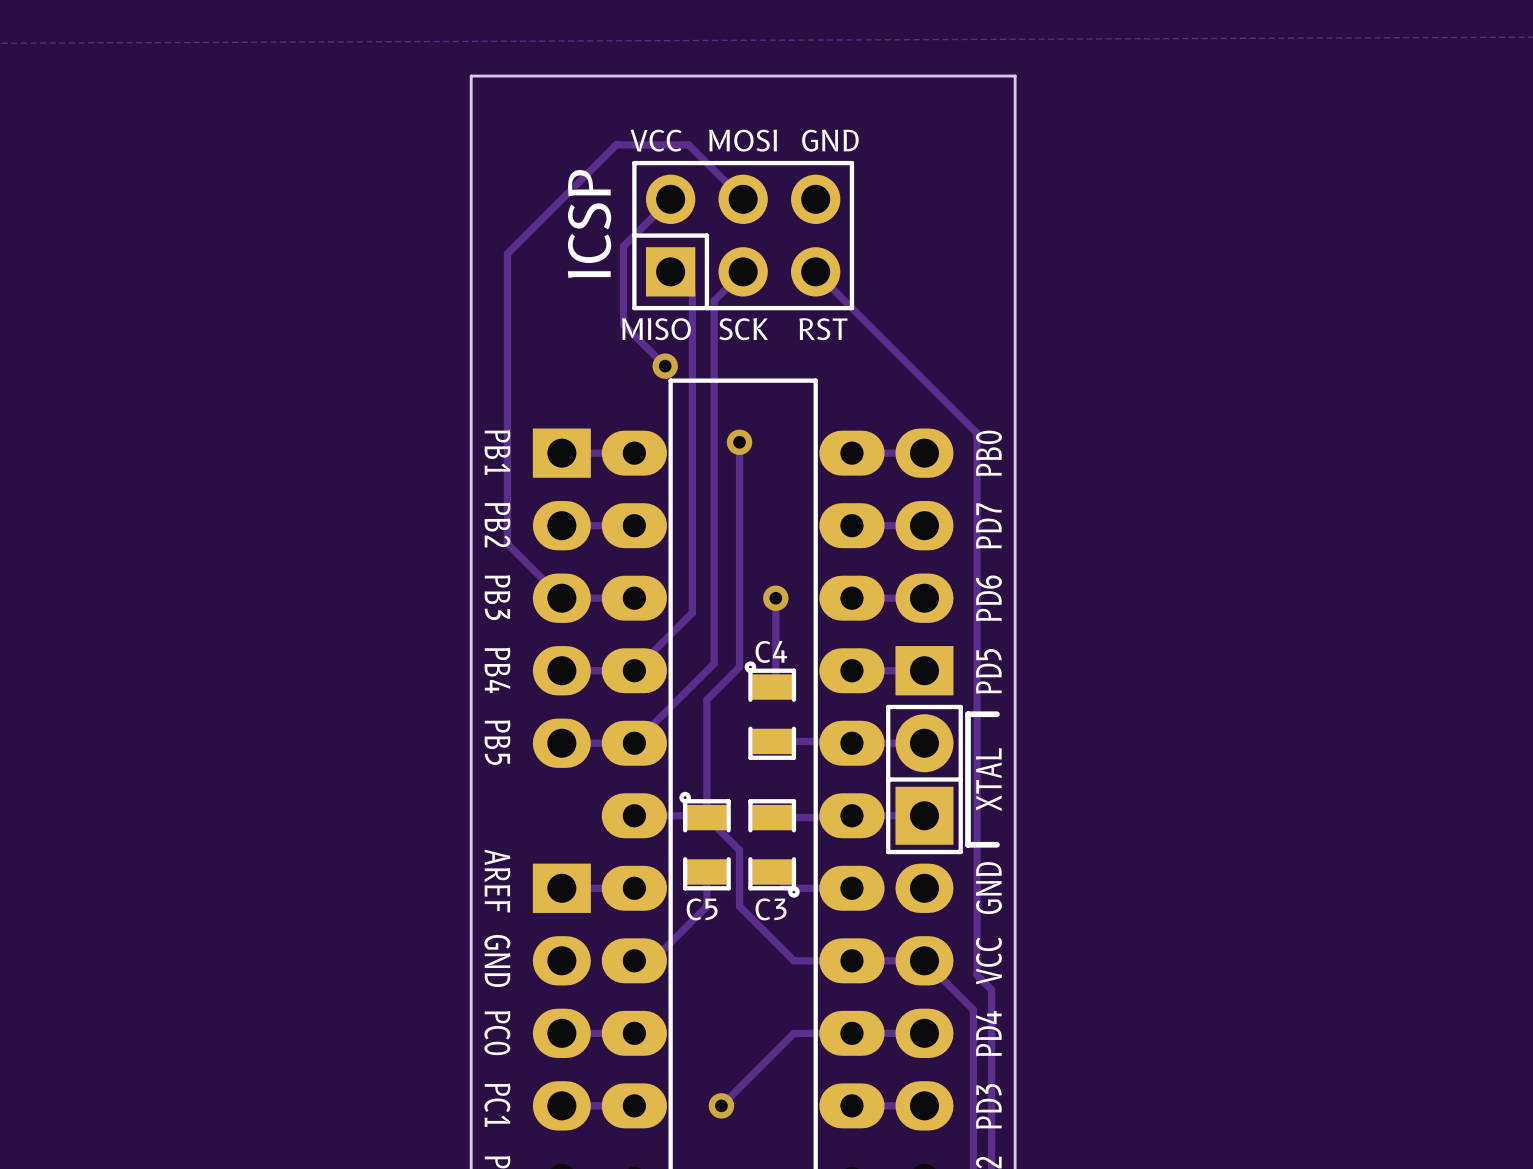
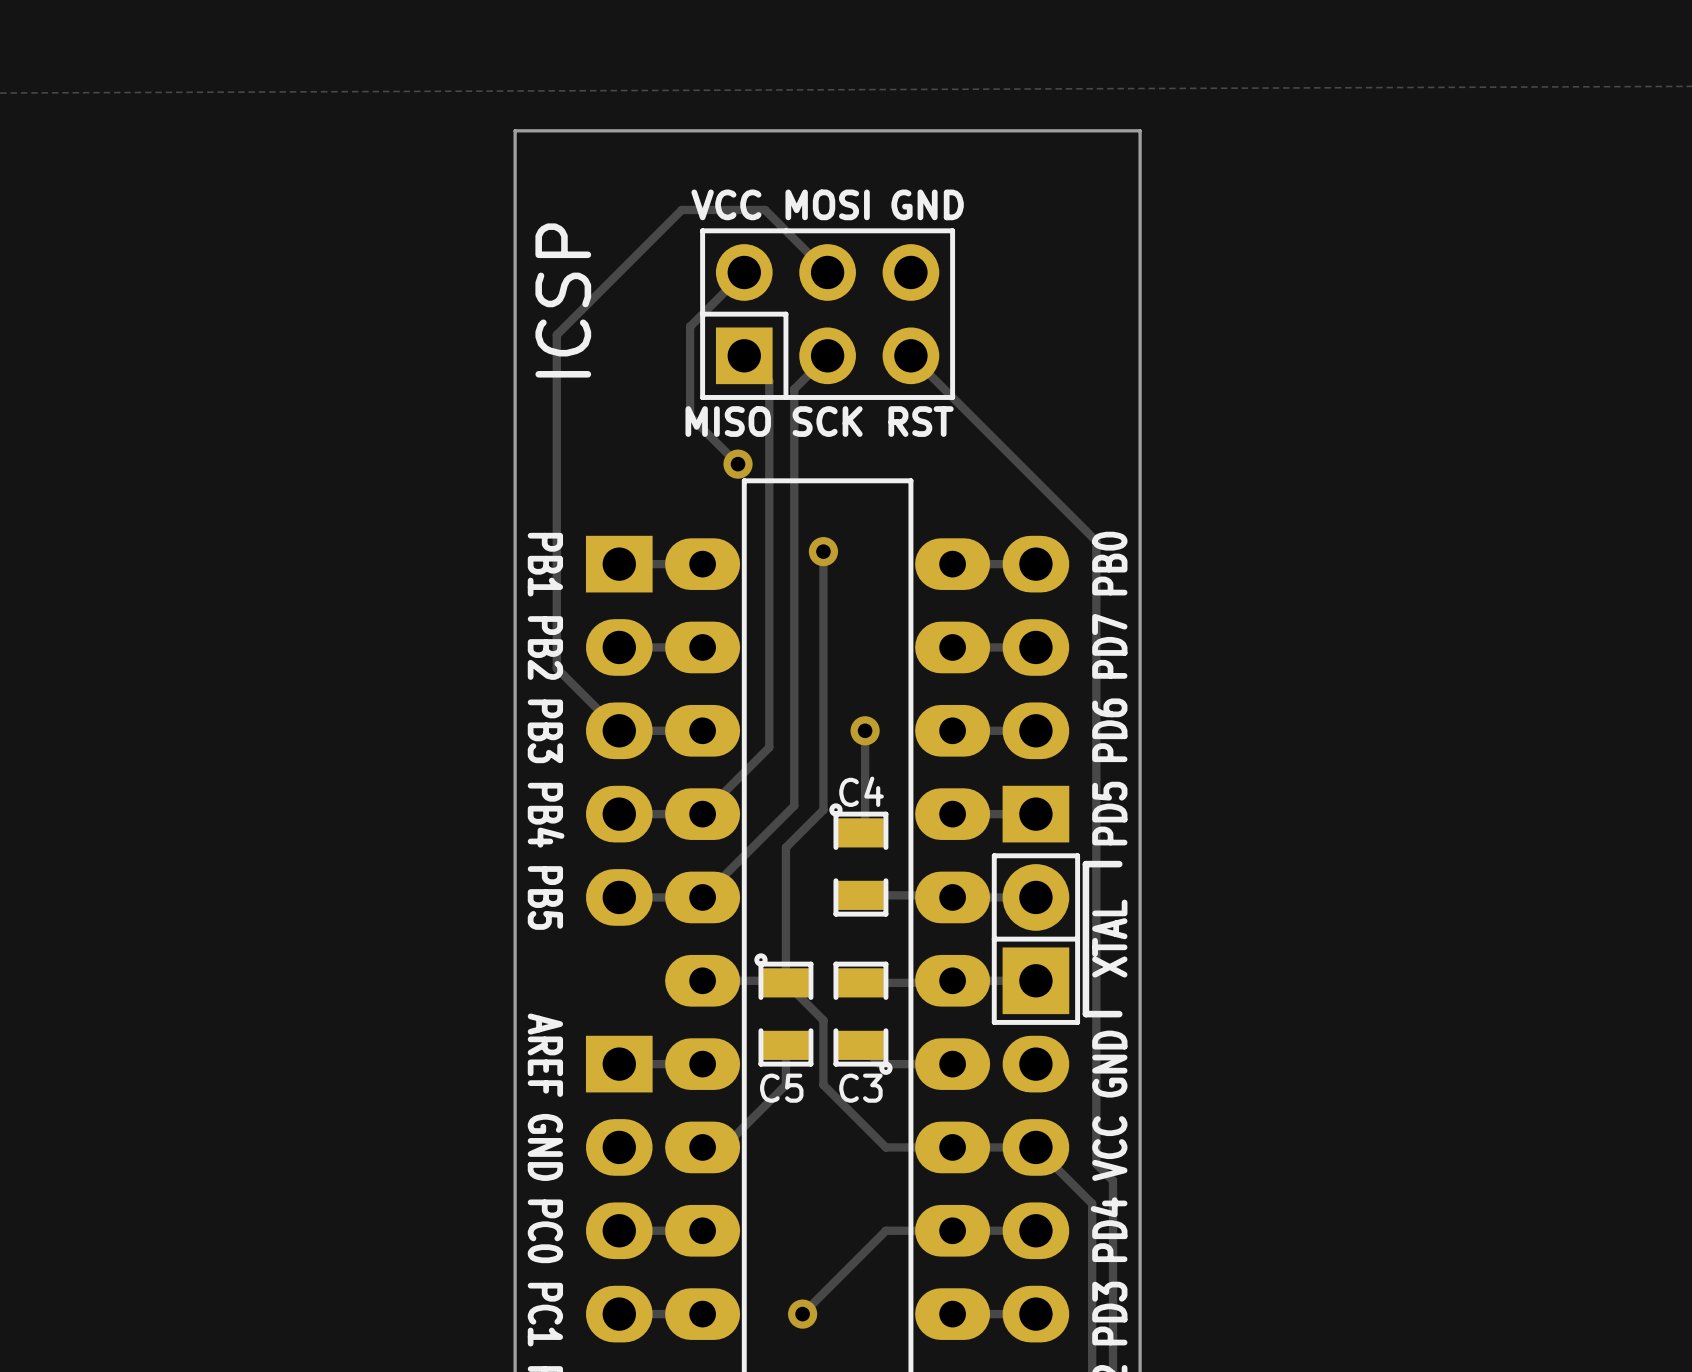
part value position: ICSP (589, 223) -> ICSP (563, 300)

